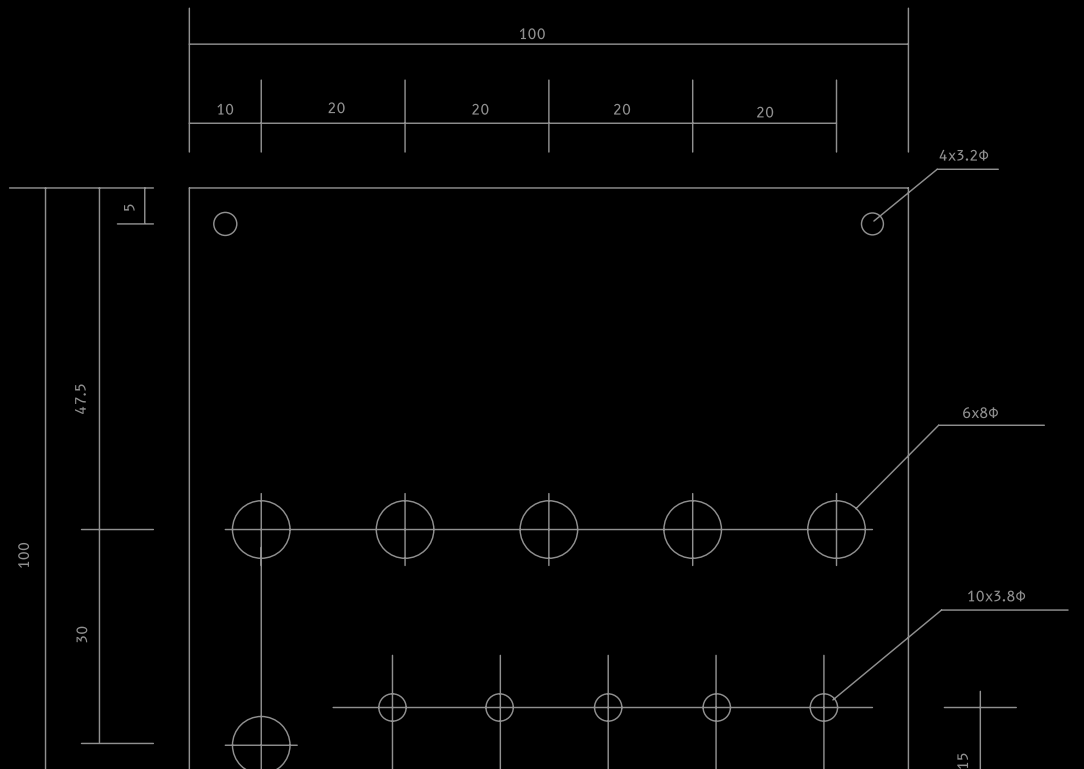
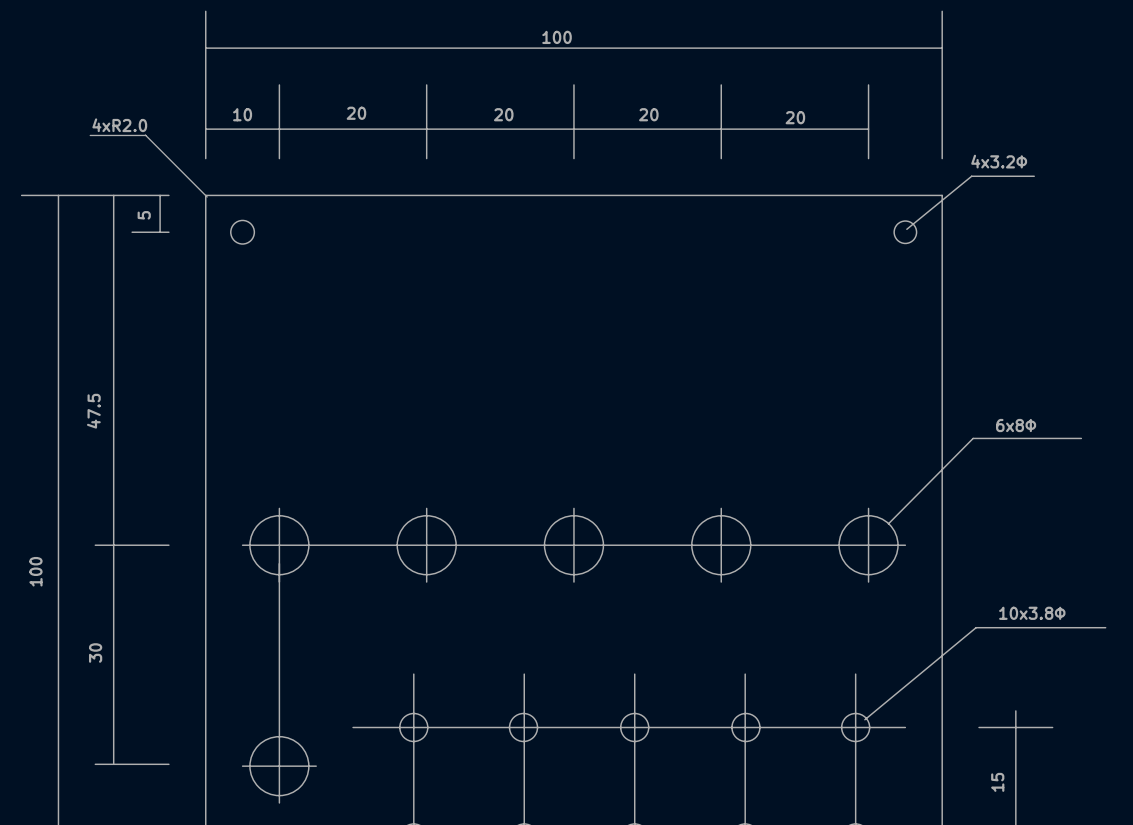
text: none -> 4xR2.0 (119, 125)
line: none -> (90, 135) (145, 135)
line: none -> (145, 135) (207, 197)

